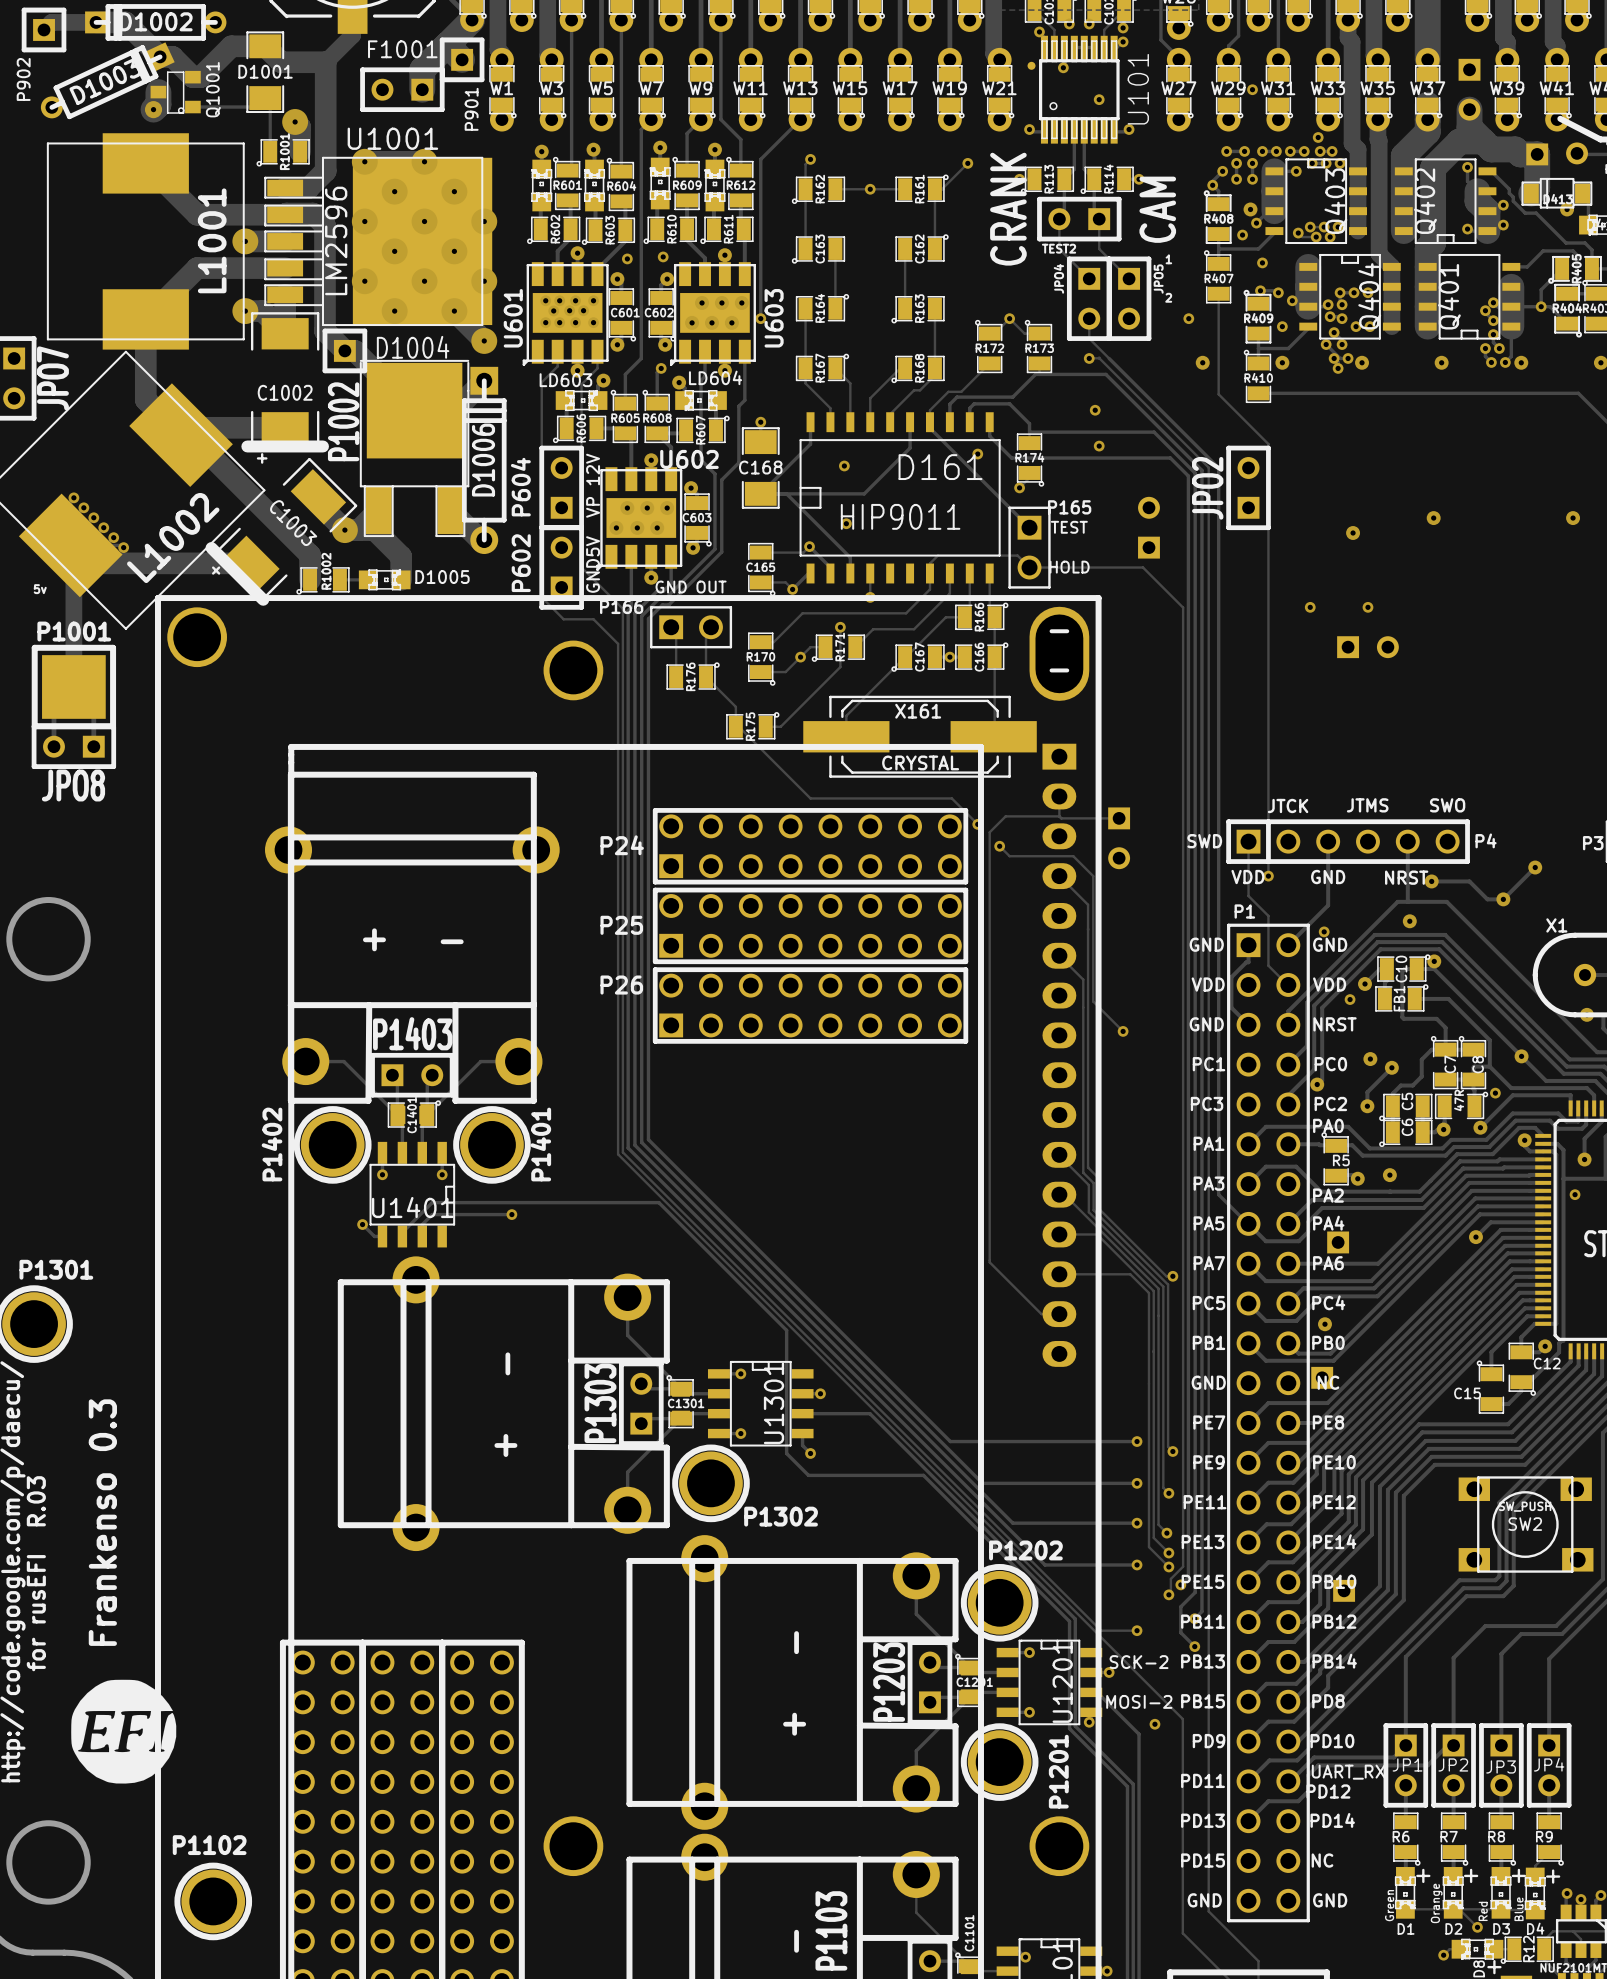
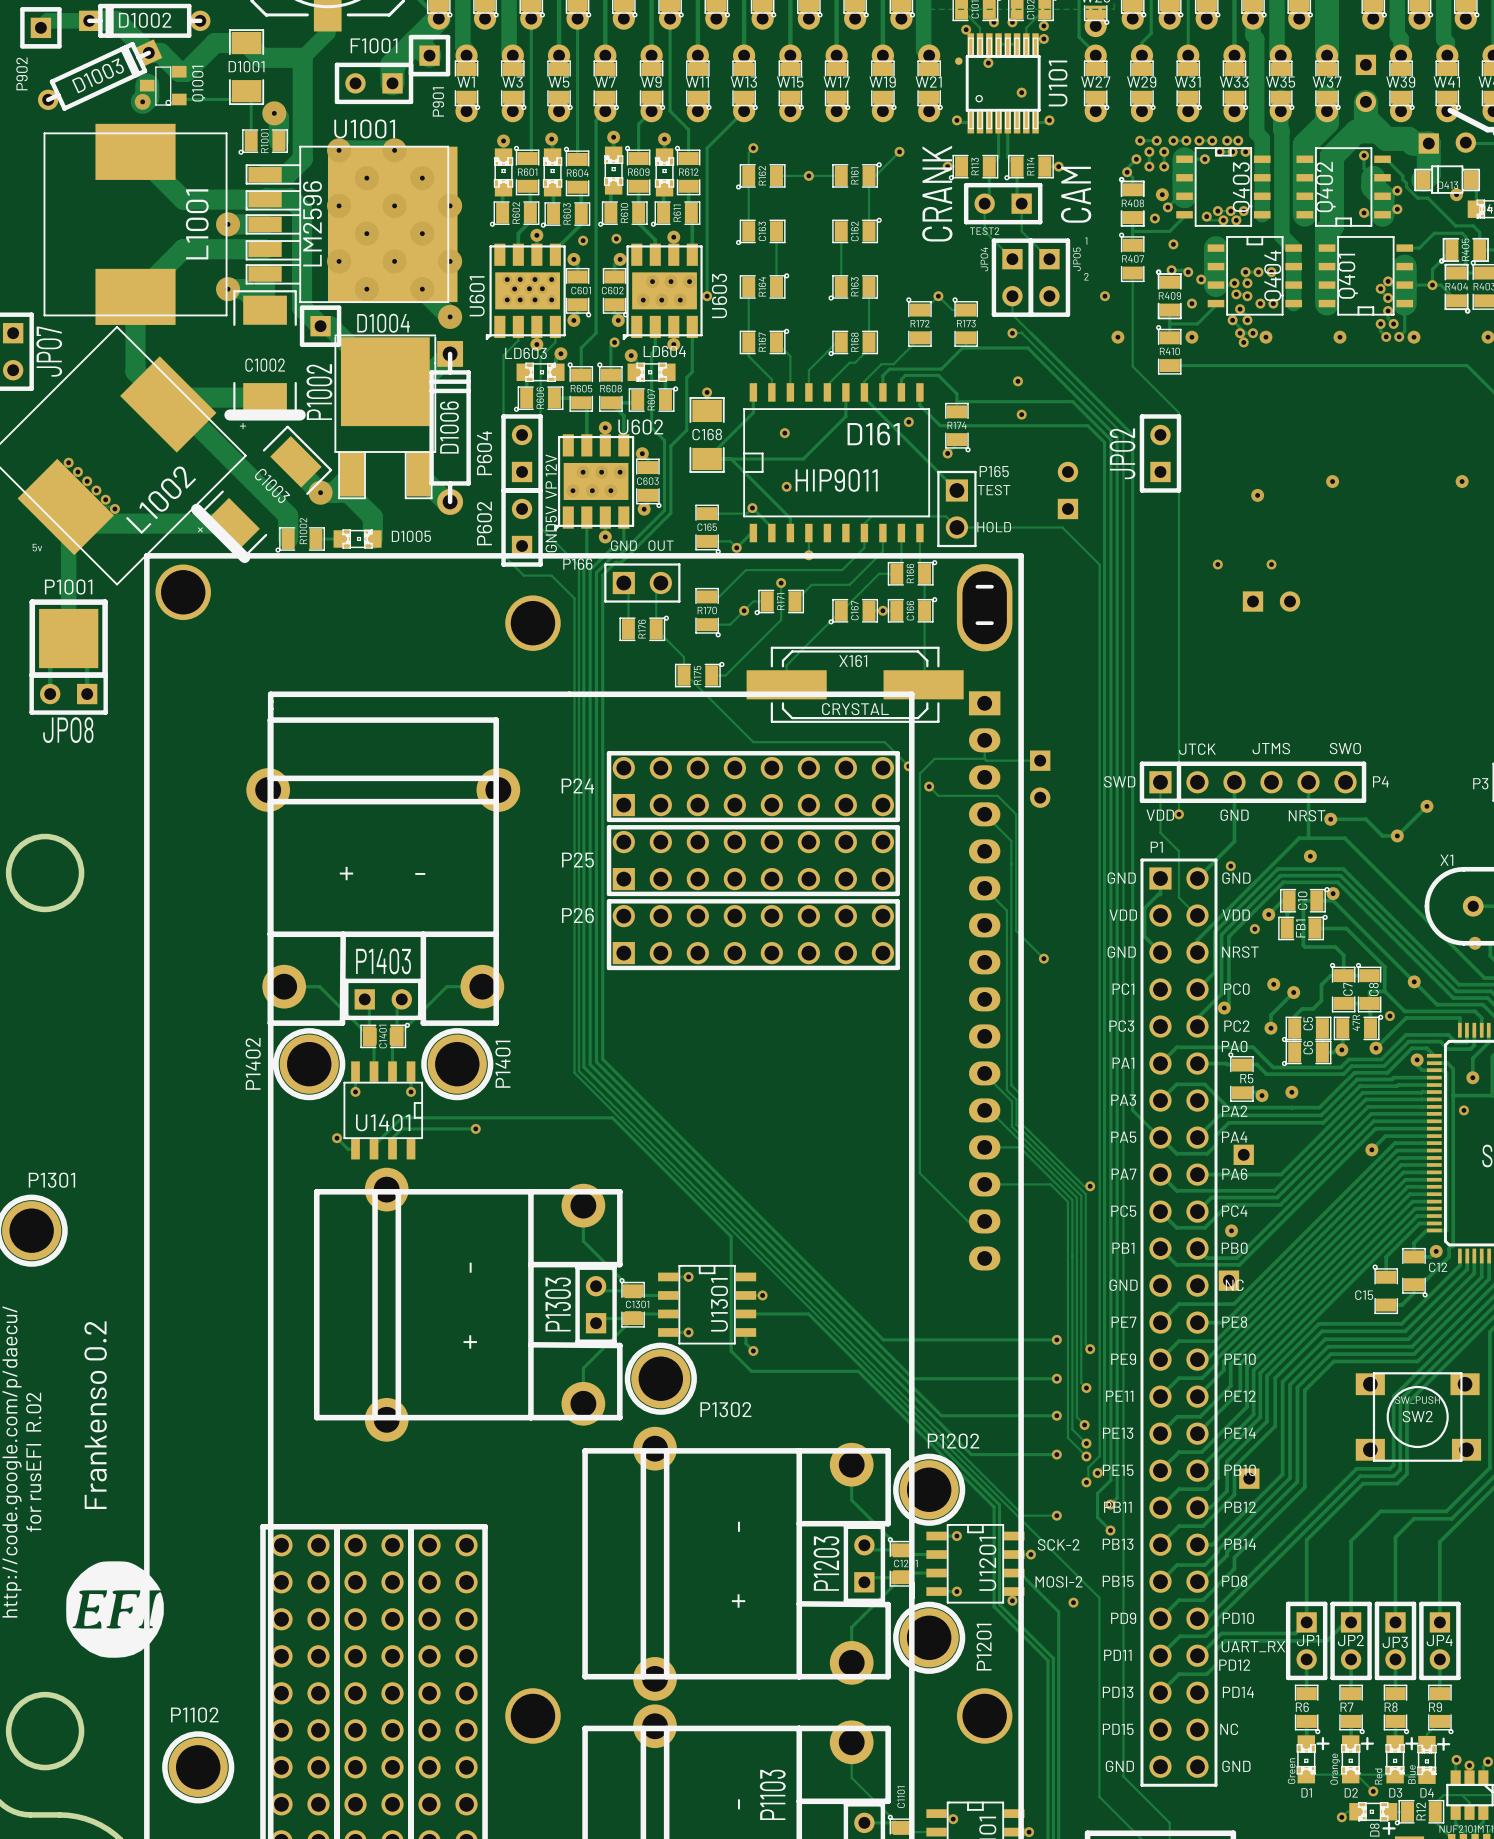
via: (1252, 89) -> none
via: (1318, 137) -> none
text: Frankenso 0.3 (102, 1522) -> Frankenso 0.2 (95, 1415)
text: for rusEFI R.03 (36, 1573) -> for rusEFI R.02 (33, 1462)

